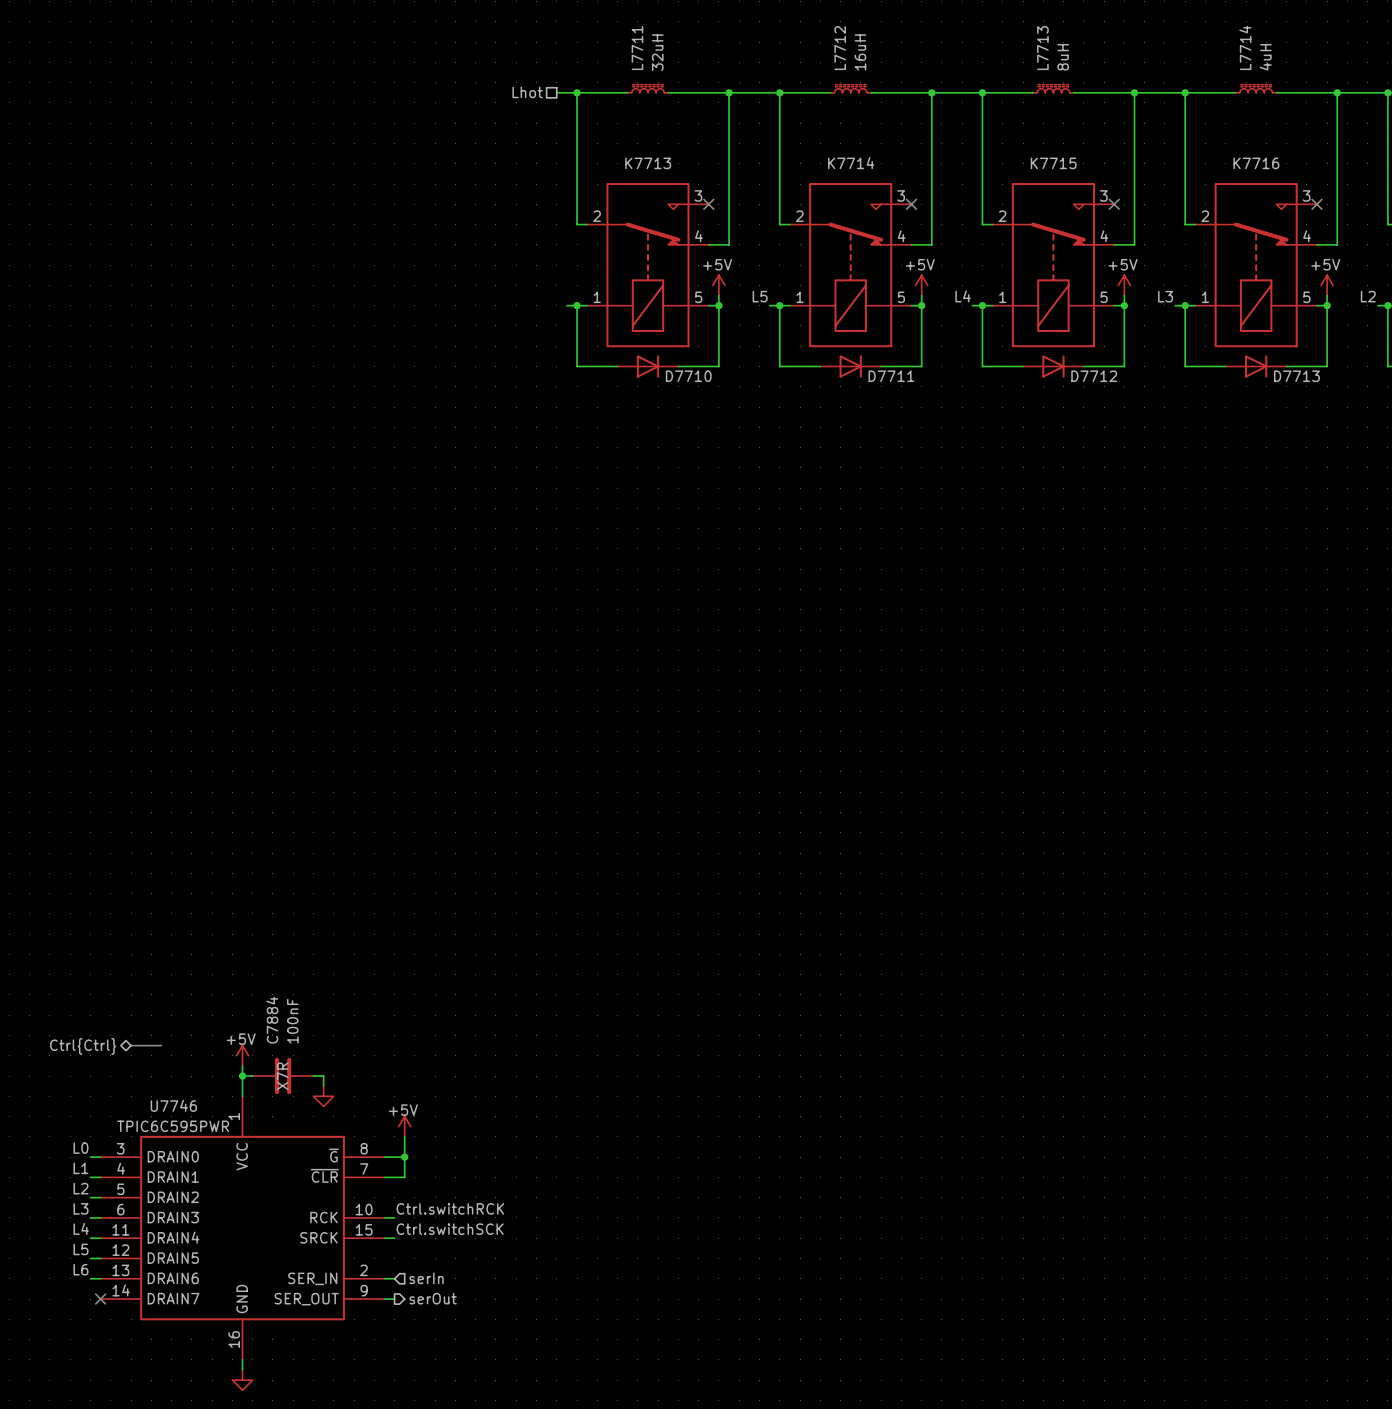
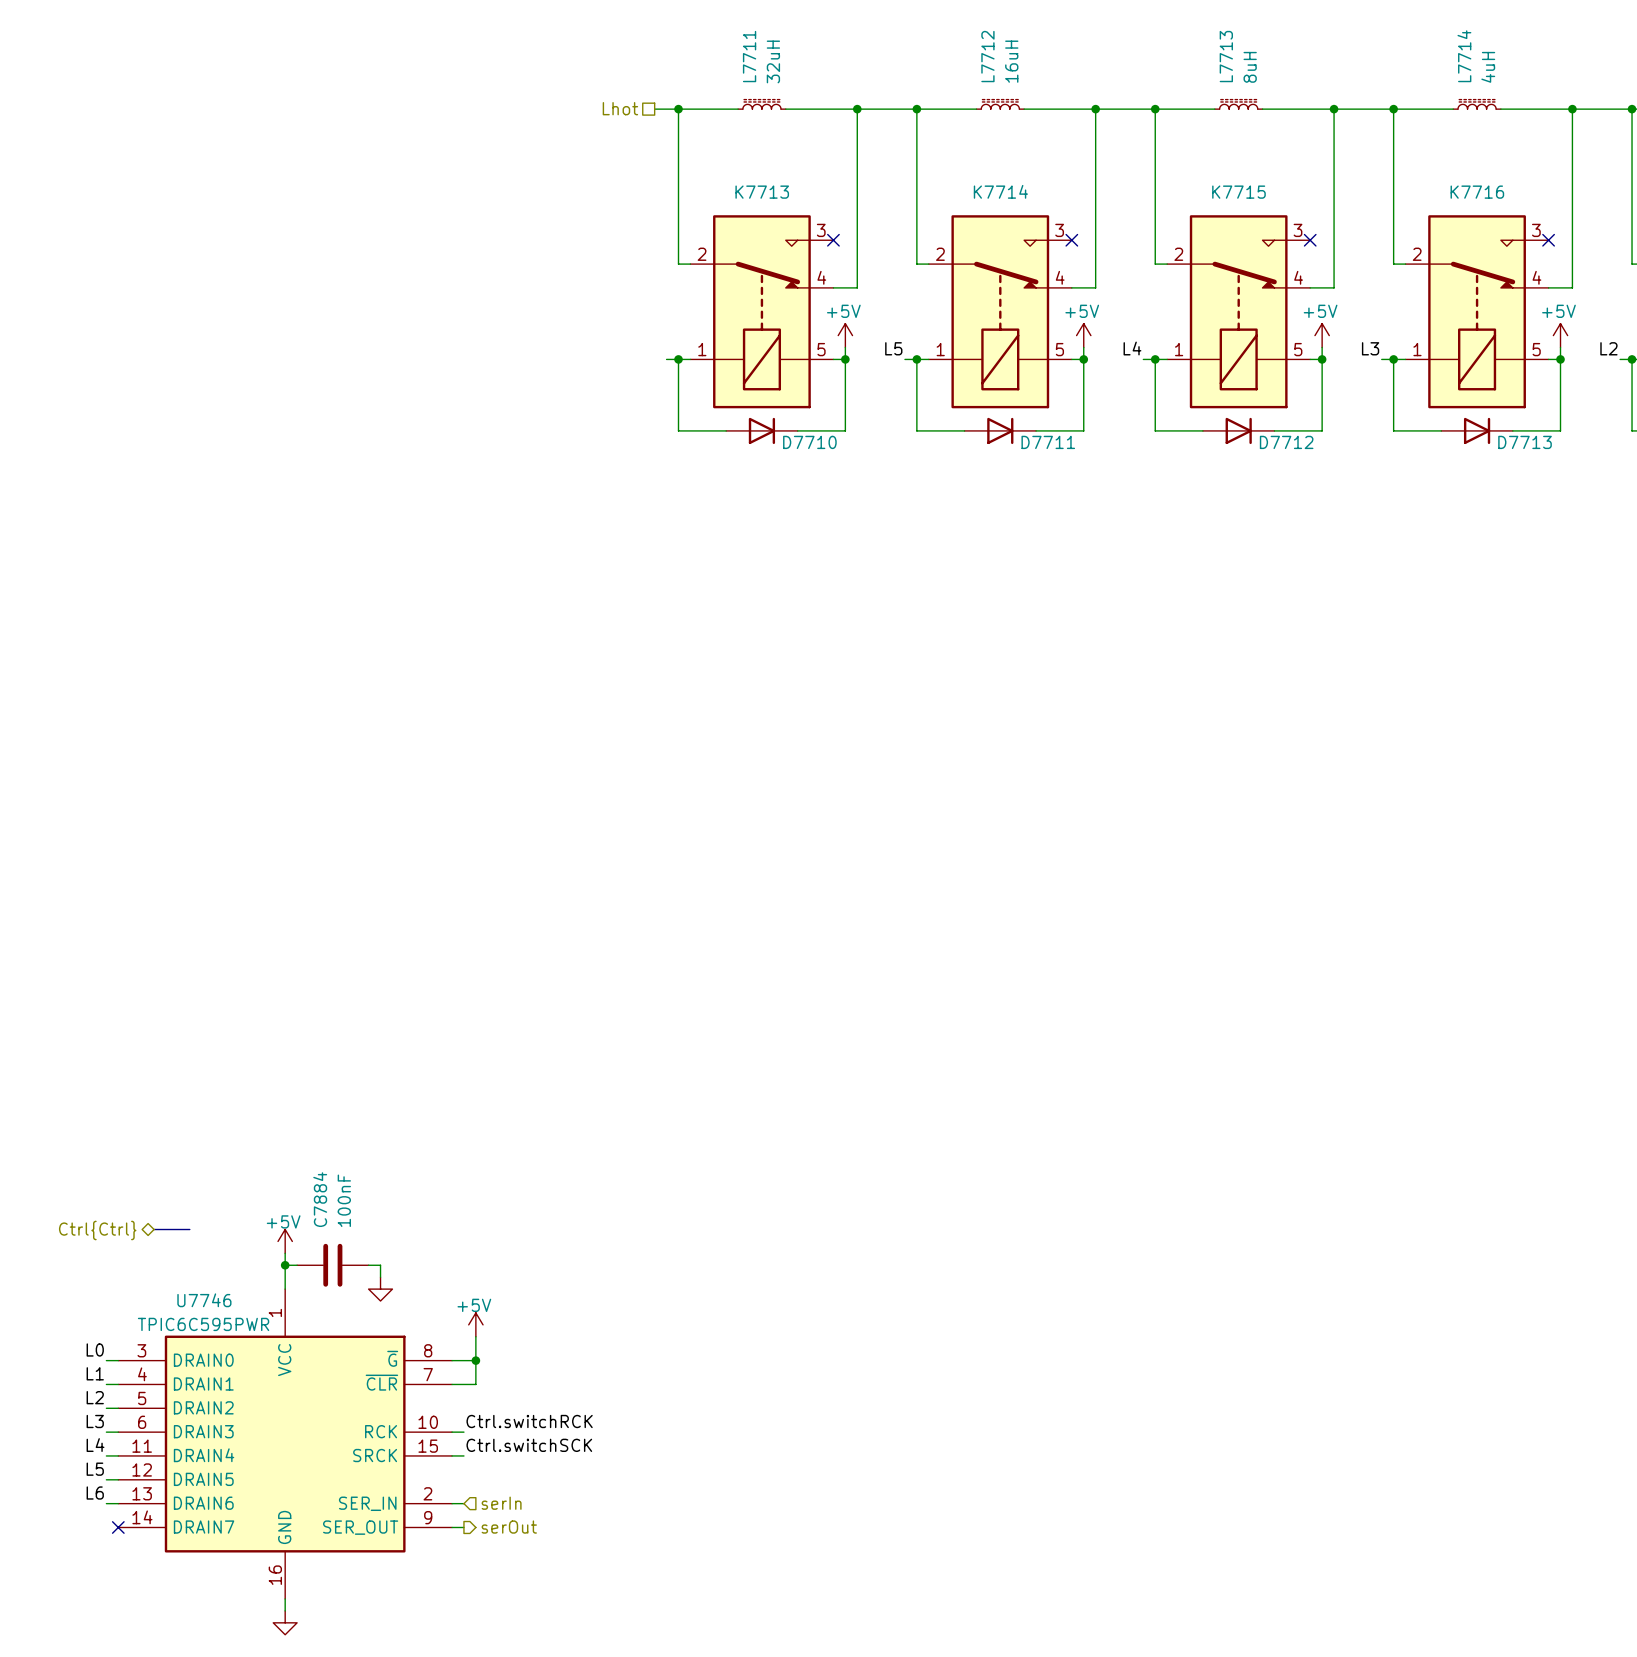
C7884 text: X7R (282, 1076) -> none

